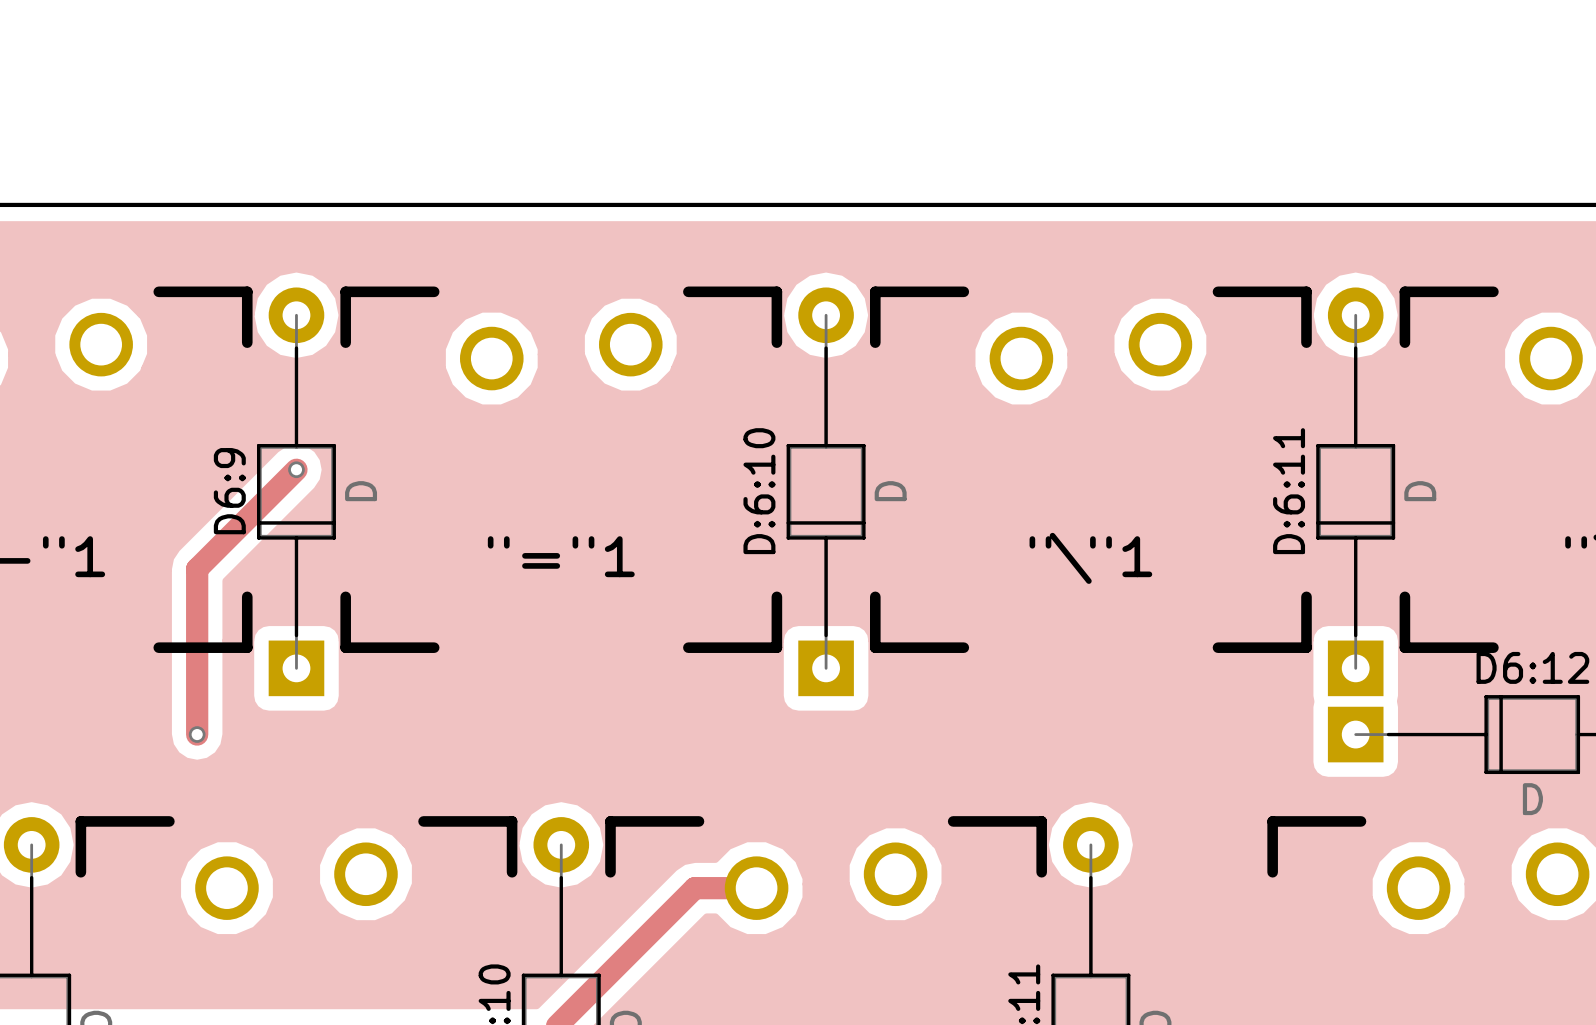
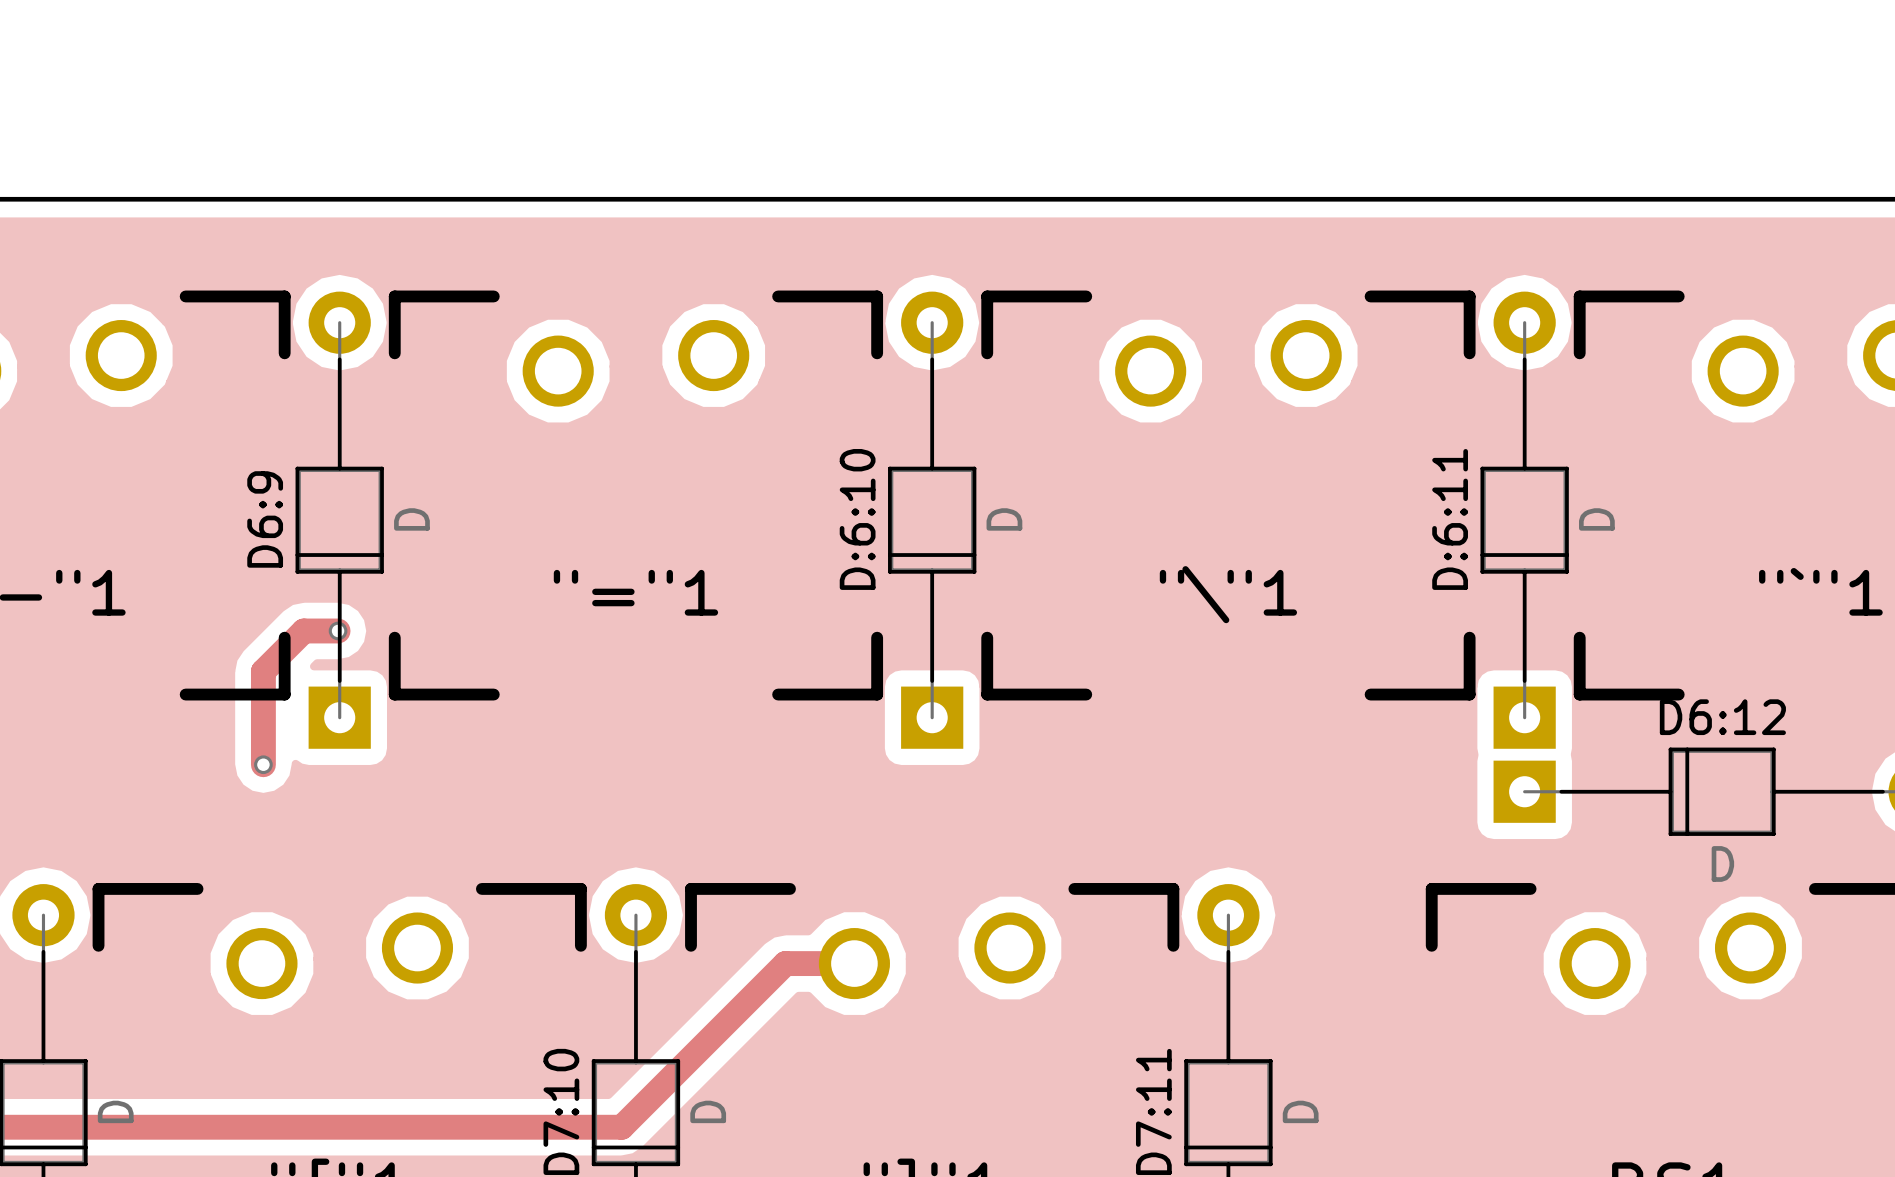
track: (296, 469) (197, 569) (197, 734) -> none
via: (296, 469) -> none
track: none -> (338, 630) (303, 630) (263, 671) (263, 764)
via: none -> (338, 630)
via position: (197, 734) -> (263, 764)

